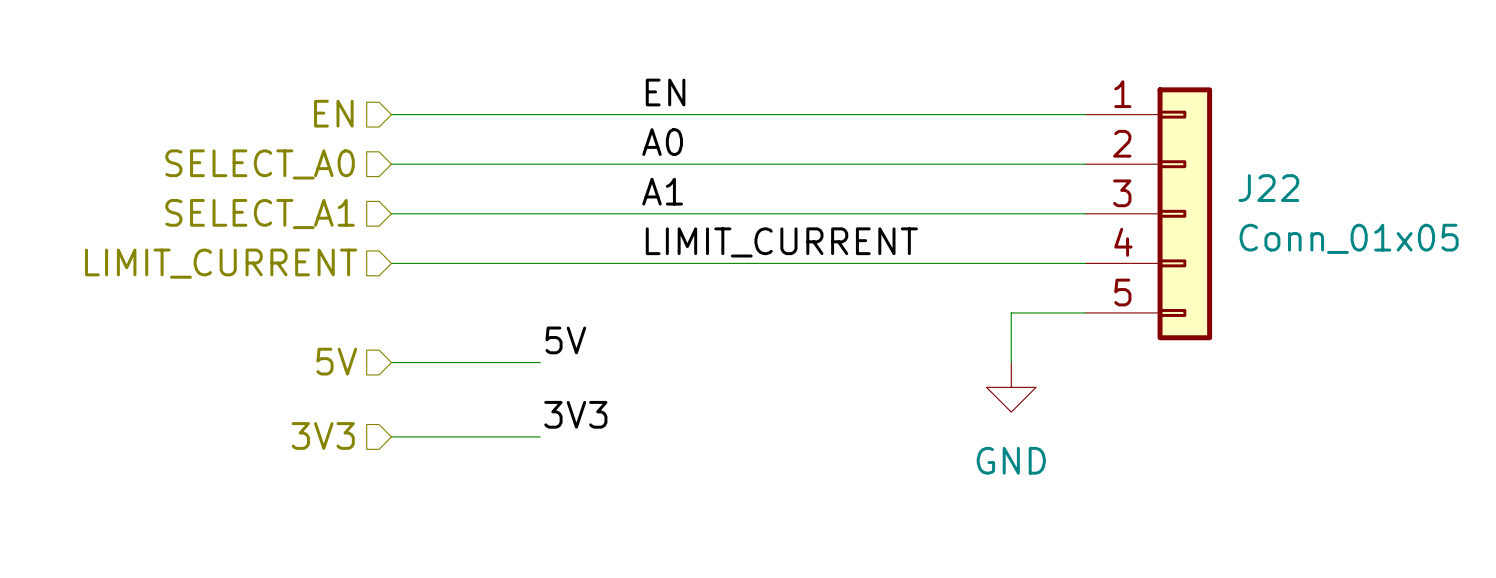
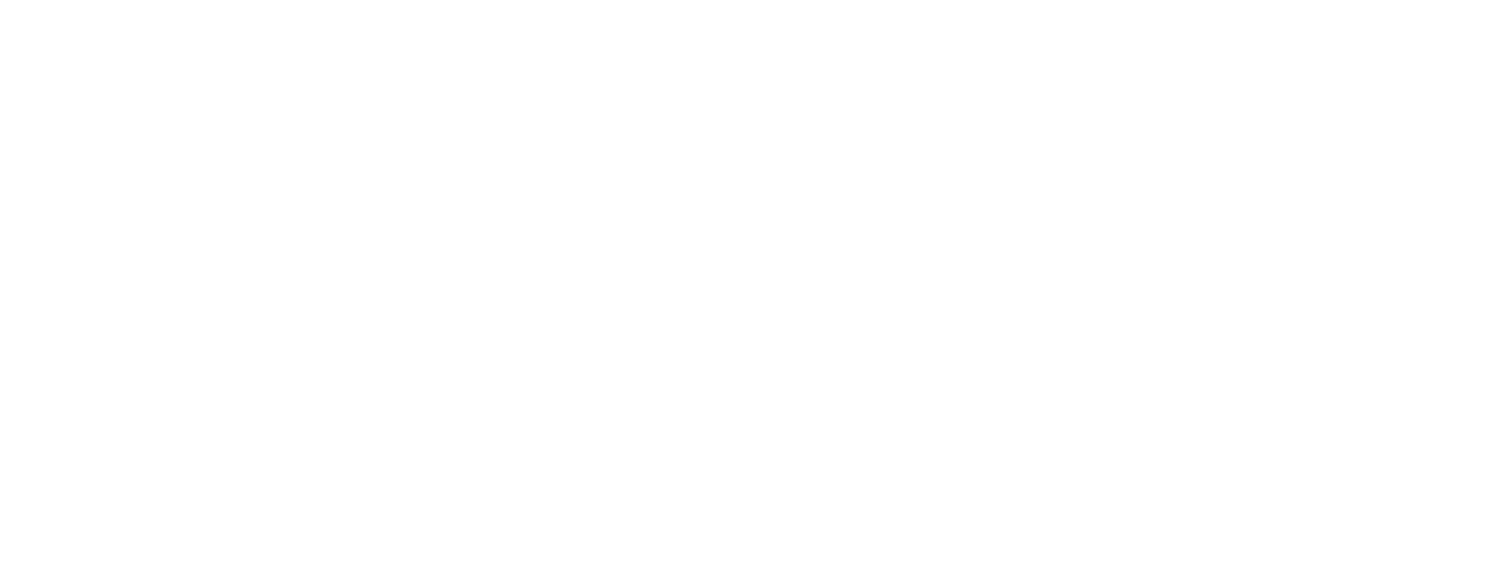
label: EN (665, 92) -> none
hierarchical label: EN (333, 113) -> none
wire: (391, 114) (1085, 114) -> none
label: A0 (662, 142) -> none
hierarchical label: SELECT_A0 (260, 164) -> none
wire: (391, 164) (1085, 164) -> none
label: A1 (662, 191) -> none
wire: (391, 213) (1085, 213) -> none
J22: Conn_01x05 (1148, 213) -> none
hierarchical label: SELECT_A1 (260, 214) -> none
label: LIMIT_CURRENT (781, 242) -> none
hierarchical label: LIMIT_CURRENT (221, 263) -> none
wire: (391, 263) (1085, 263) -> none
wire: (1085, 312) (1011, 312) (1011, 362) -> none
label: 5V (565, 340) -> none
hierarchical label: 5V (336, 361) -> none
wire: (391, 362) (540, 362) -> none
power symbol: GND (1011, 387) -> none
label: 3V3 (575, 414) -> none
hierarchical label: 3V3 (323, 435) -> none
wire: (391, 436) (540, 436) -> none

